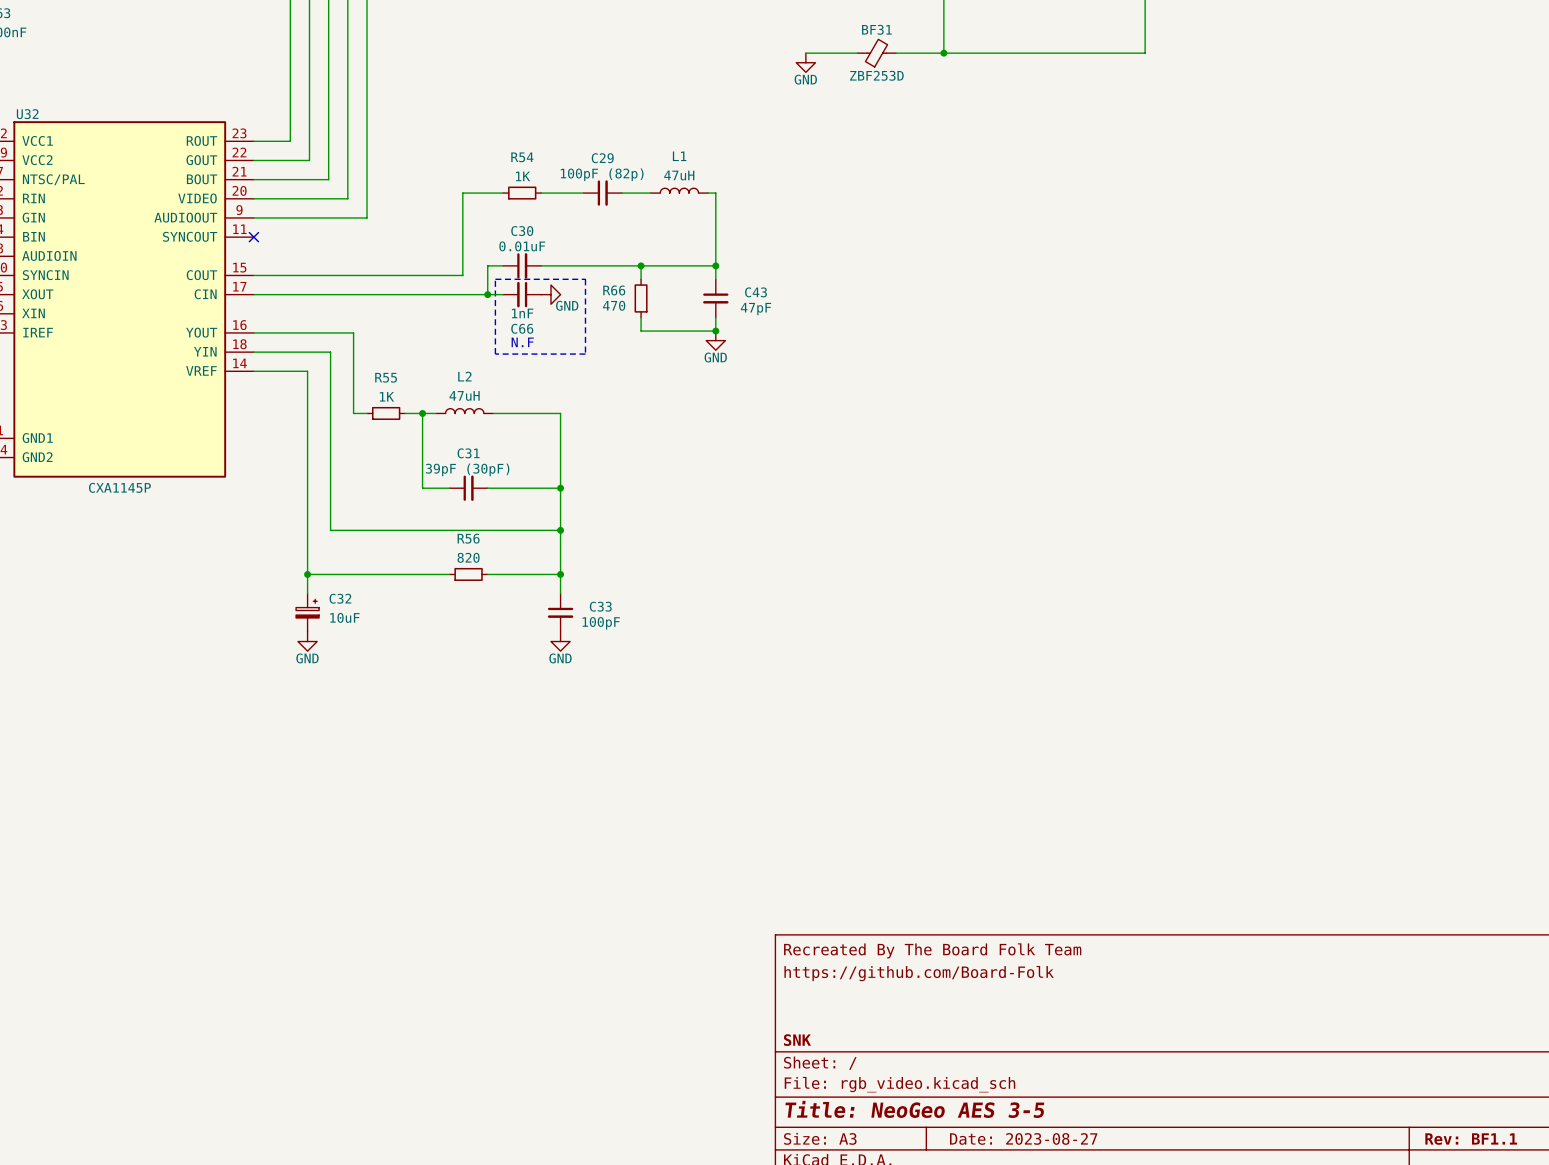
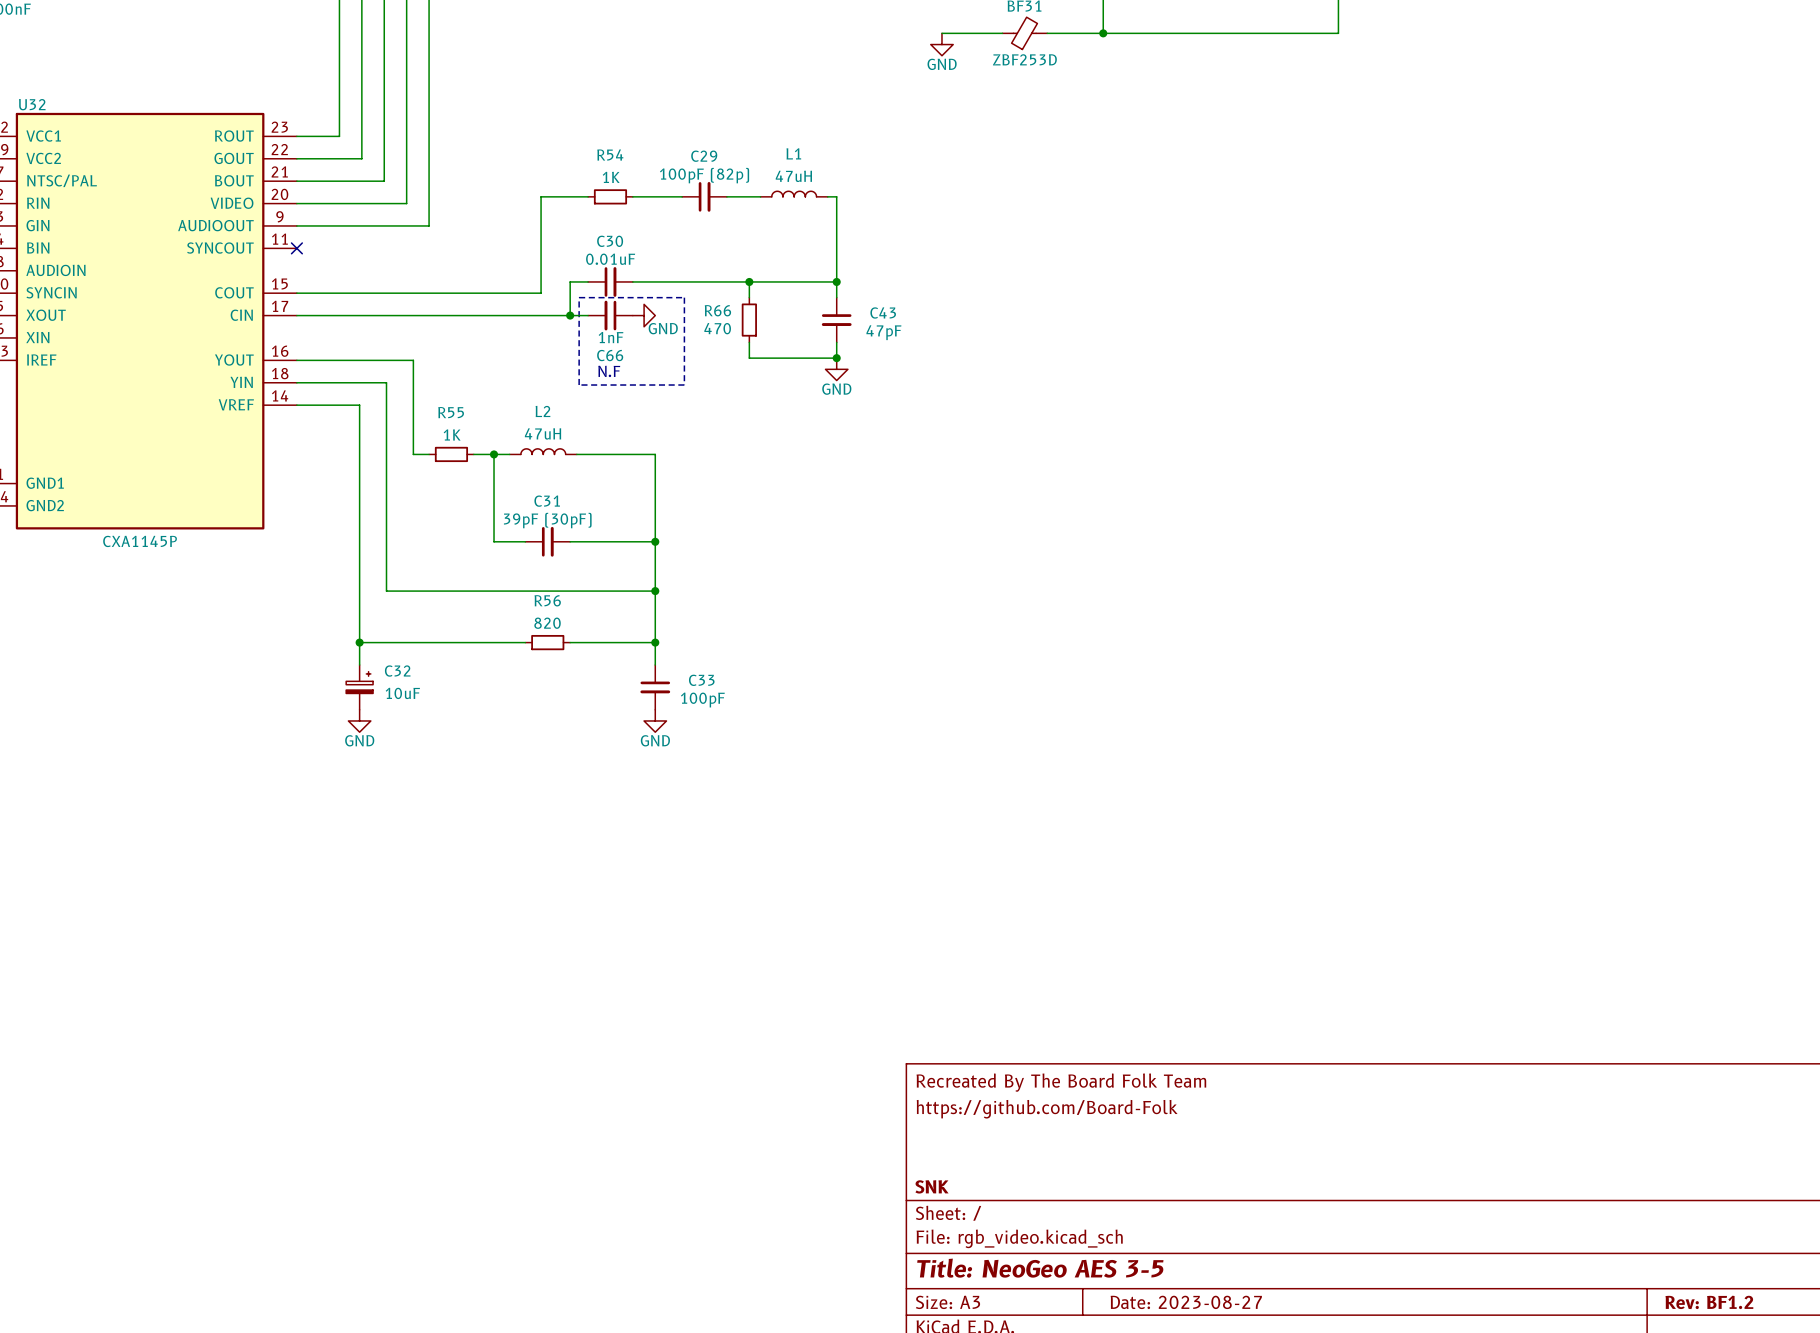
title block: Rev: BF1.1 (1471, 1139) -> Rev: BF1.2 (1709, 1302)

